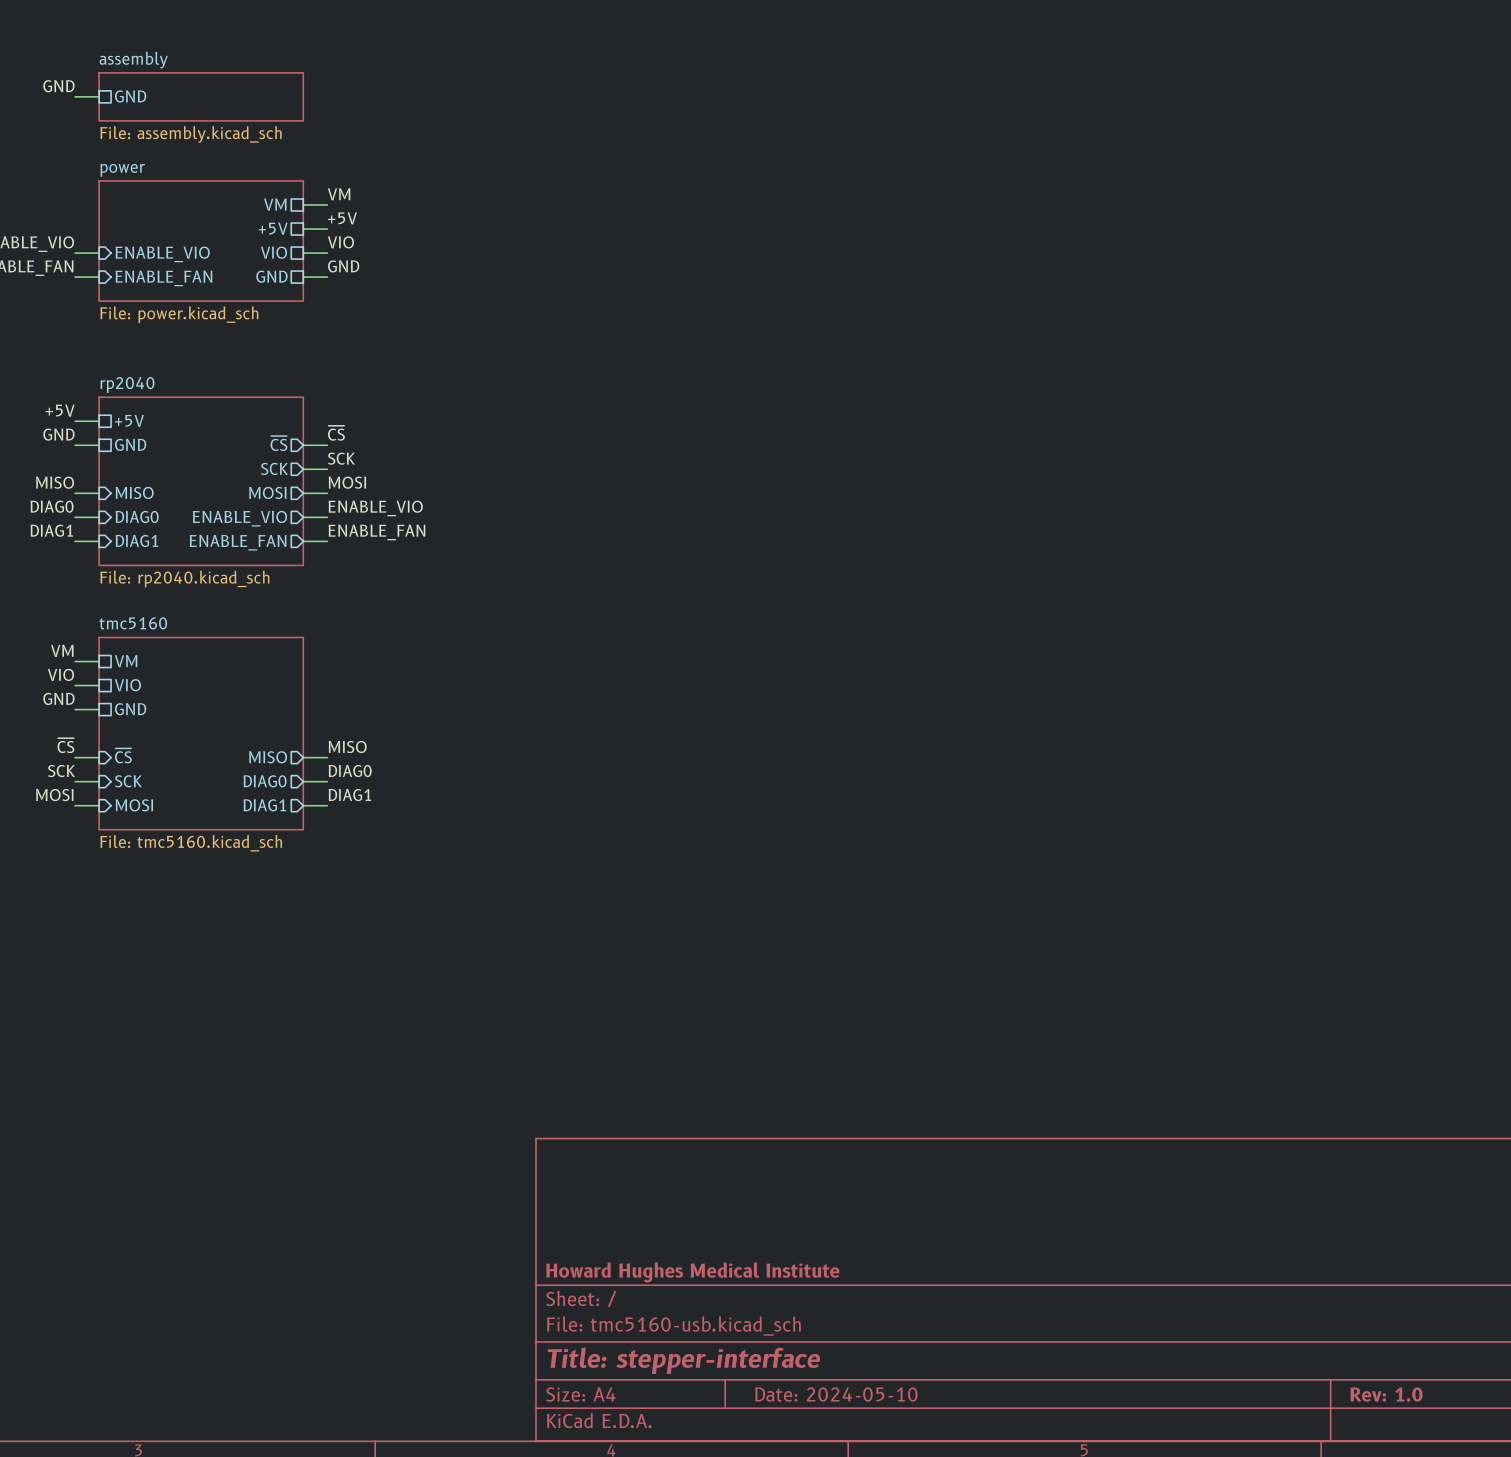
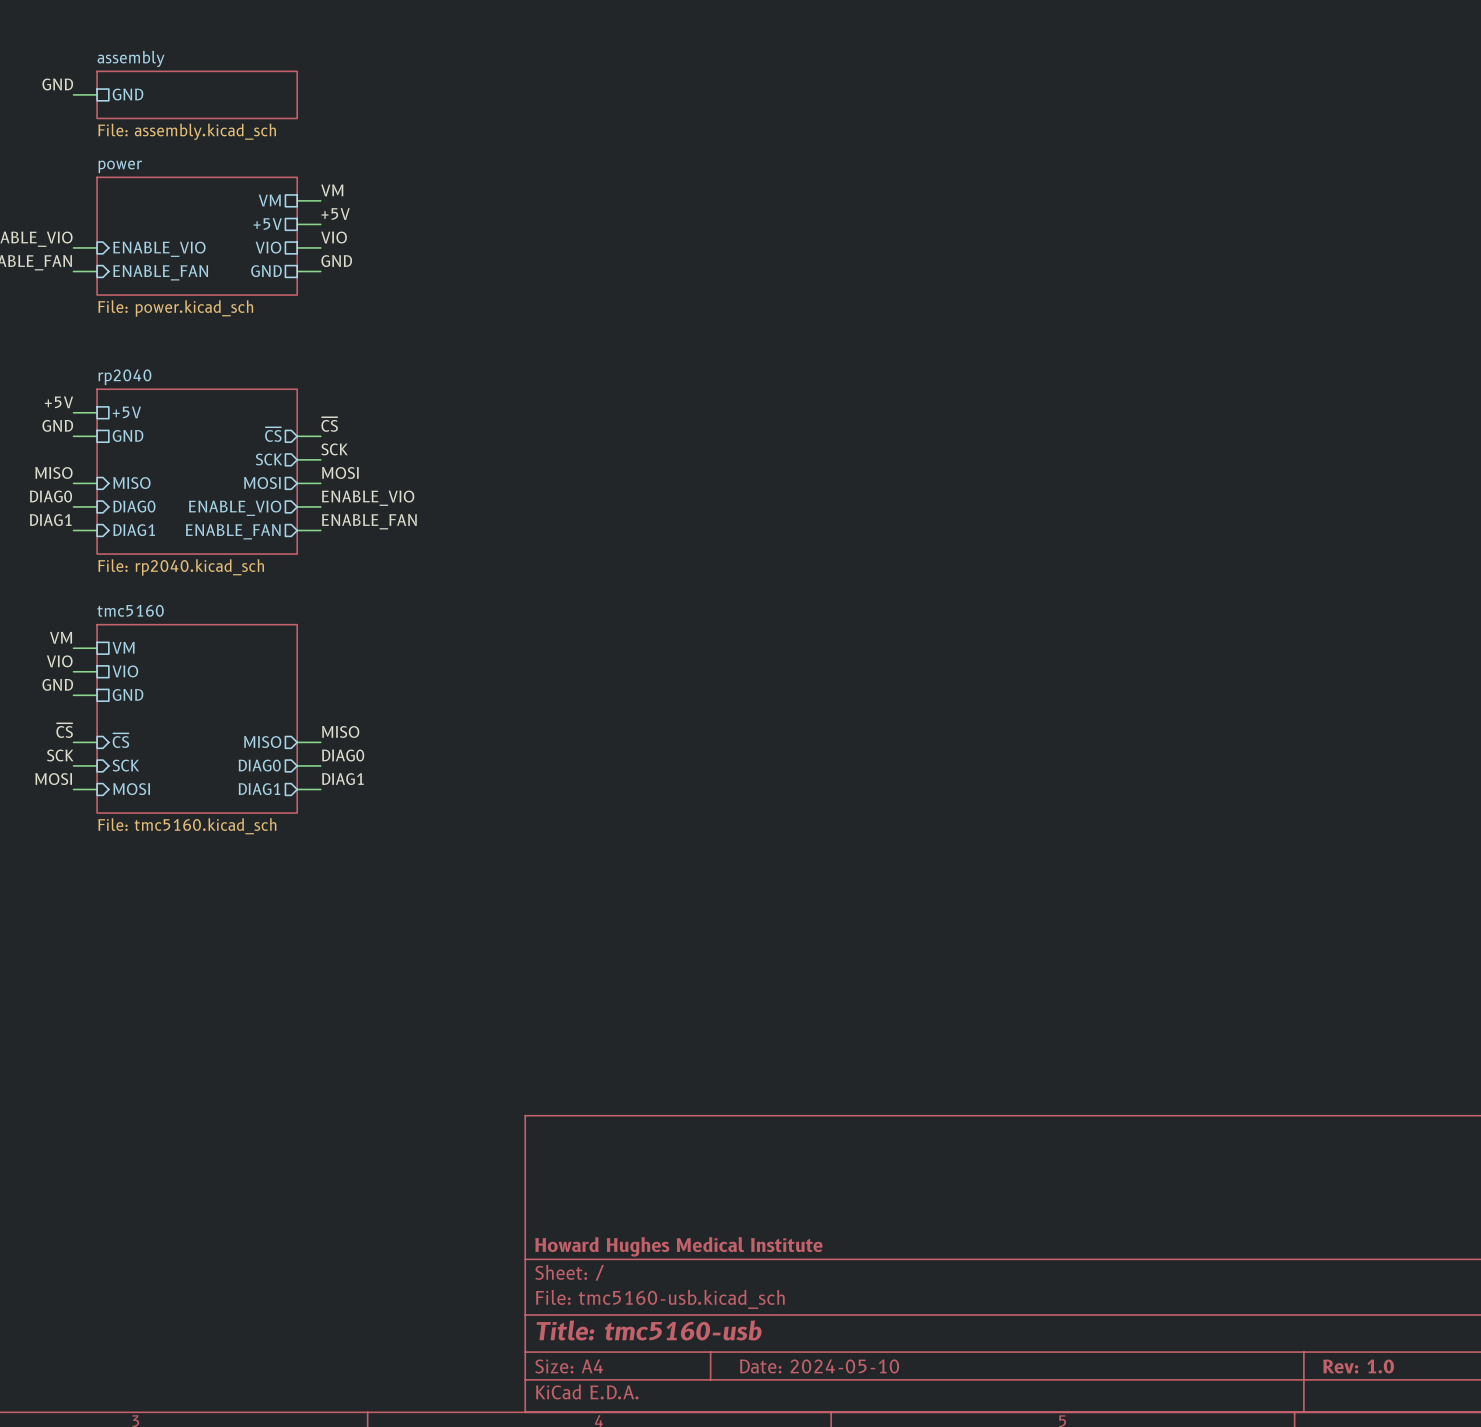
title block: Title: stepper-interface (683, 1360) -> Title: tmc5160-usb (649, 1330)

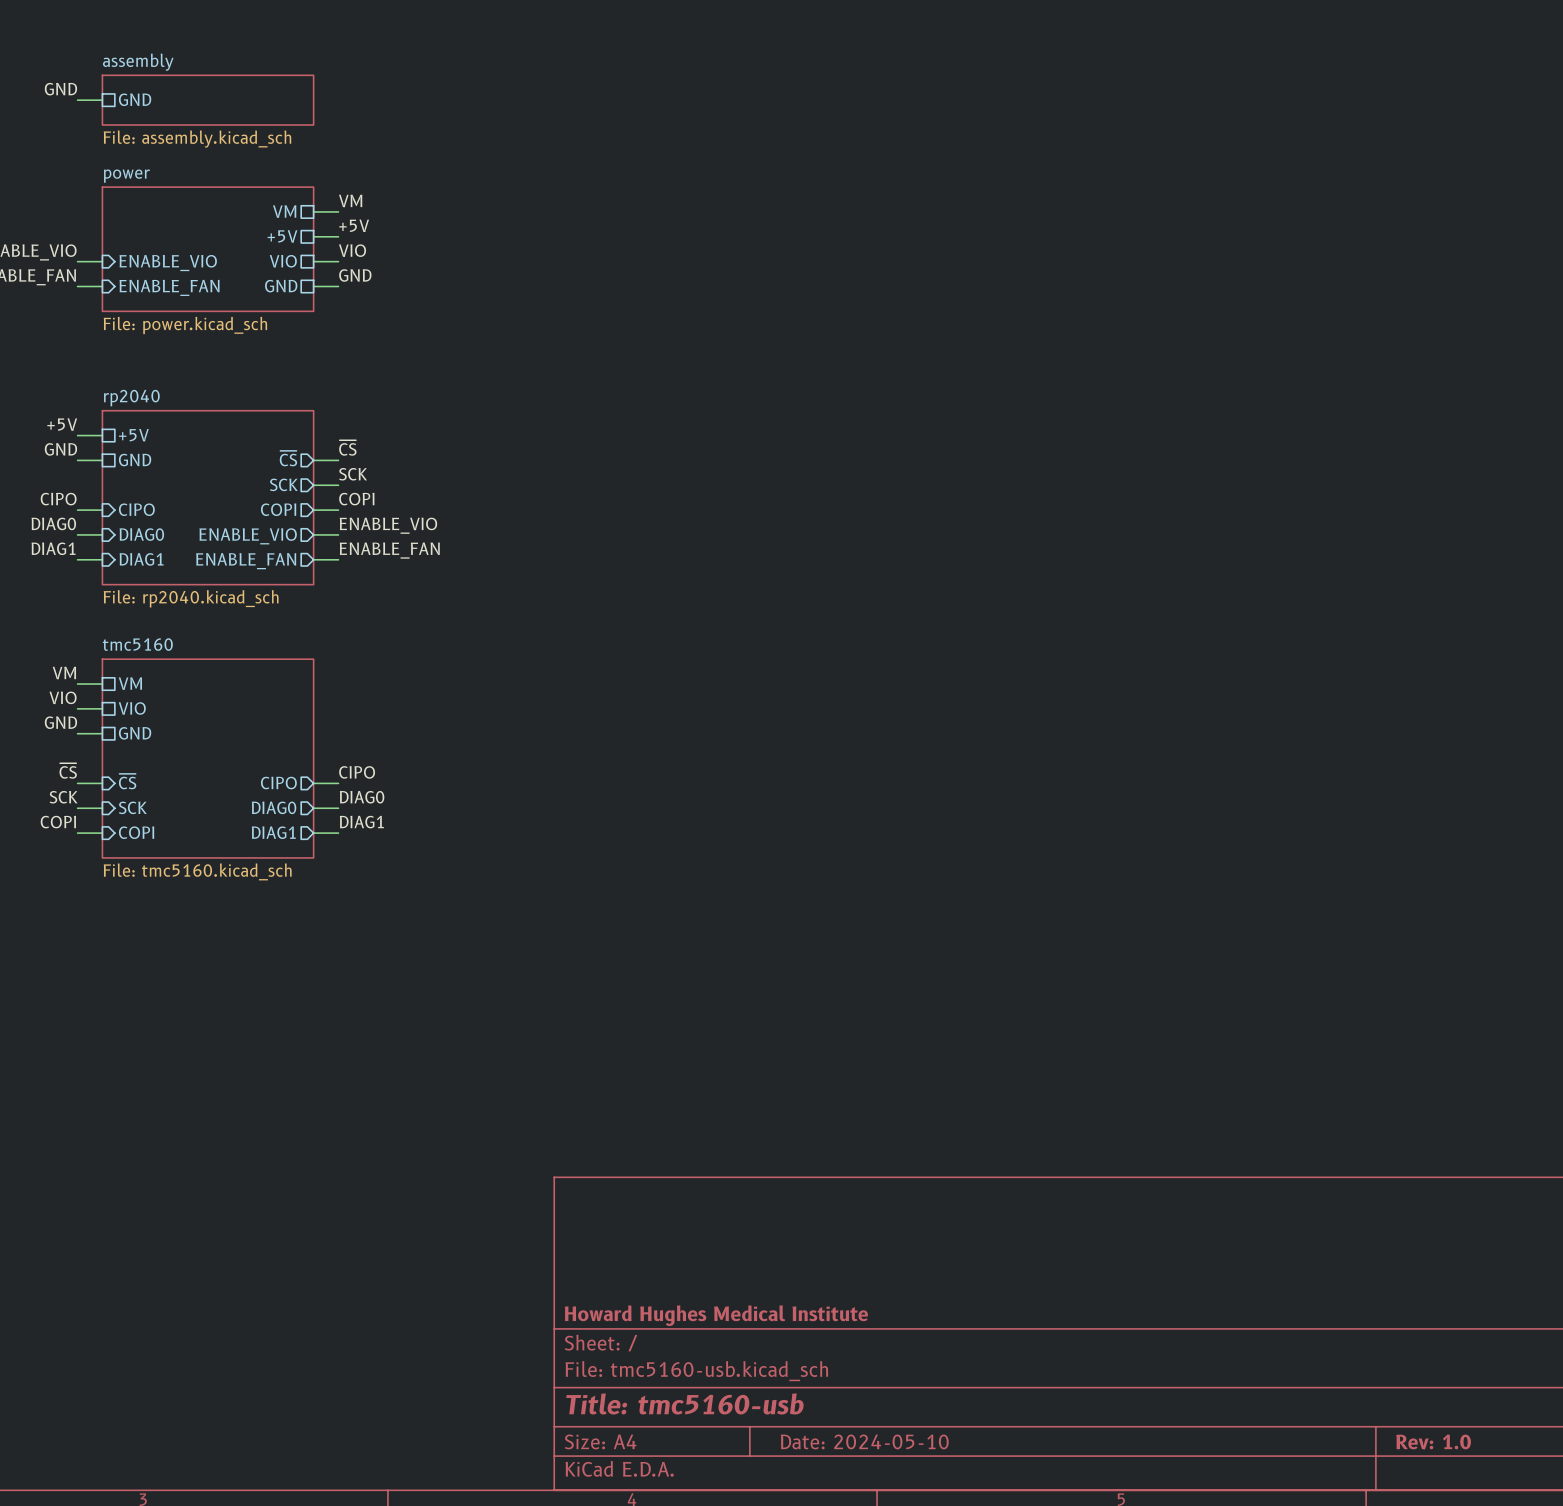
label: MISO (53, 472) -> CIPO (58, 499)
label: MOSI (340, 472) -> COPI (356, 499)
sheet pin: MISO (131, 483) -> CIPO (136, 509)
sheet pin: MOSI (262, 483) -> COPI (278, 509)
label: MISO (340, 731) -> CIPO (357, 772)
sheet pin: MISO (262, 742) -> CIPO (278, 783)
label: MOSI (53, 779) -> COPI (58, 822)
sheet pin: MOSI (131, 789) -> COPI (136, 832)

